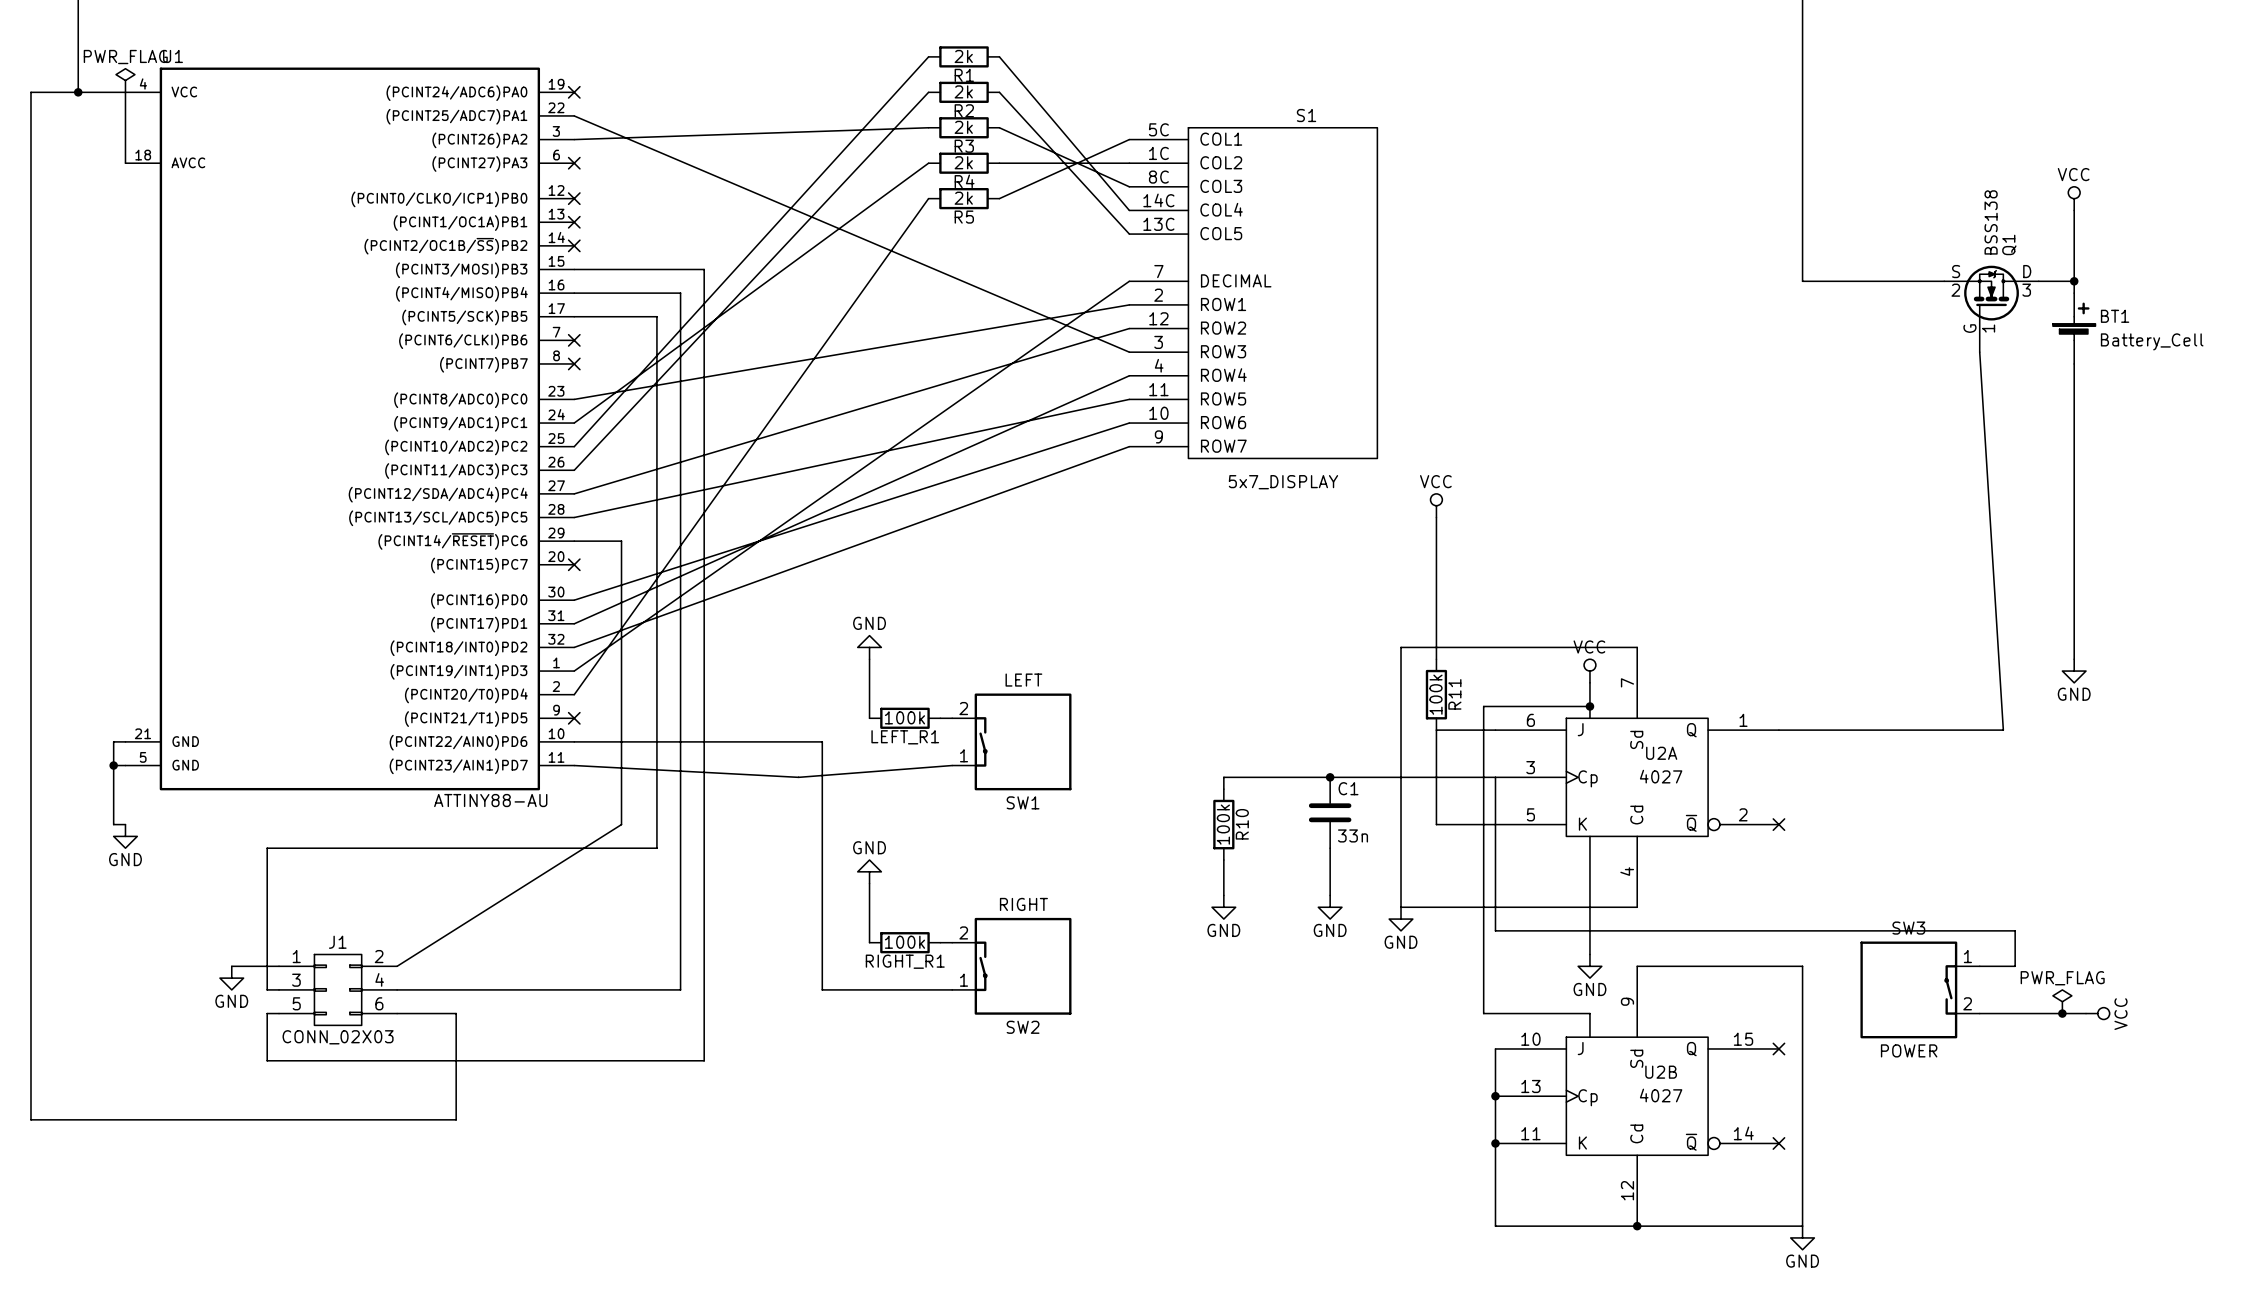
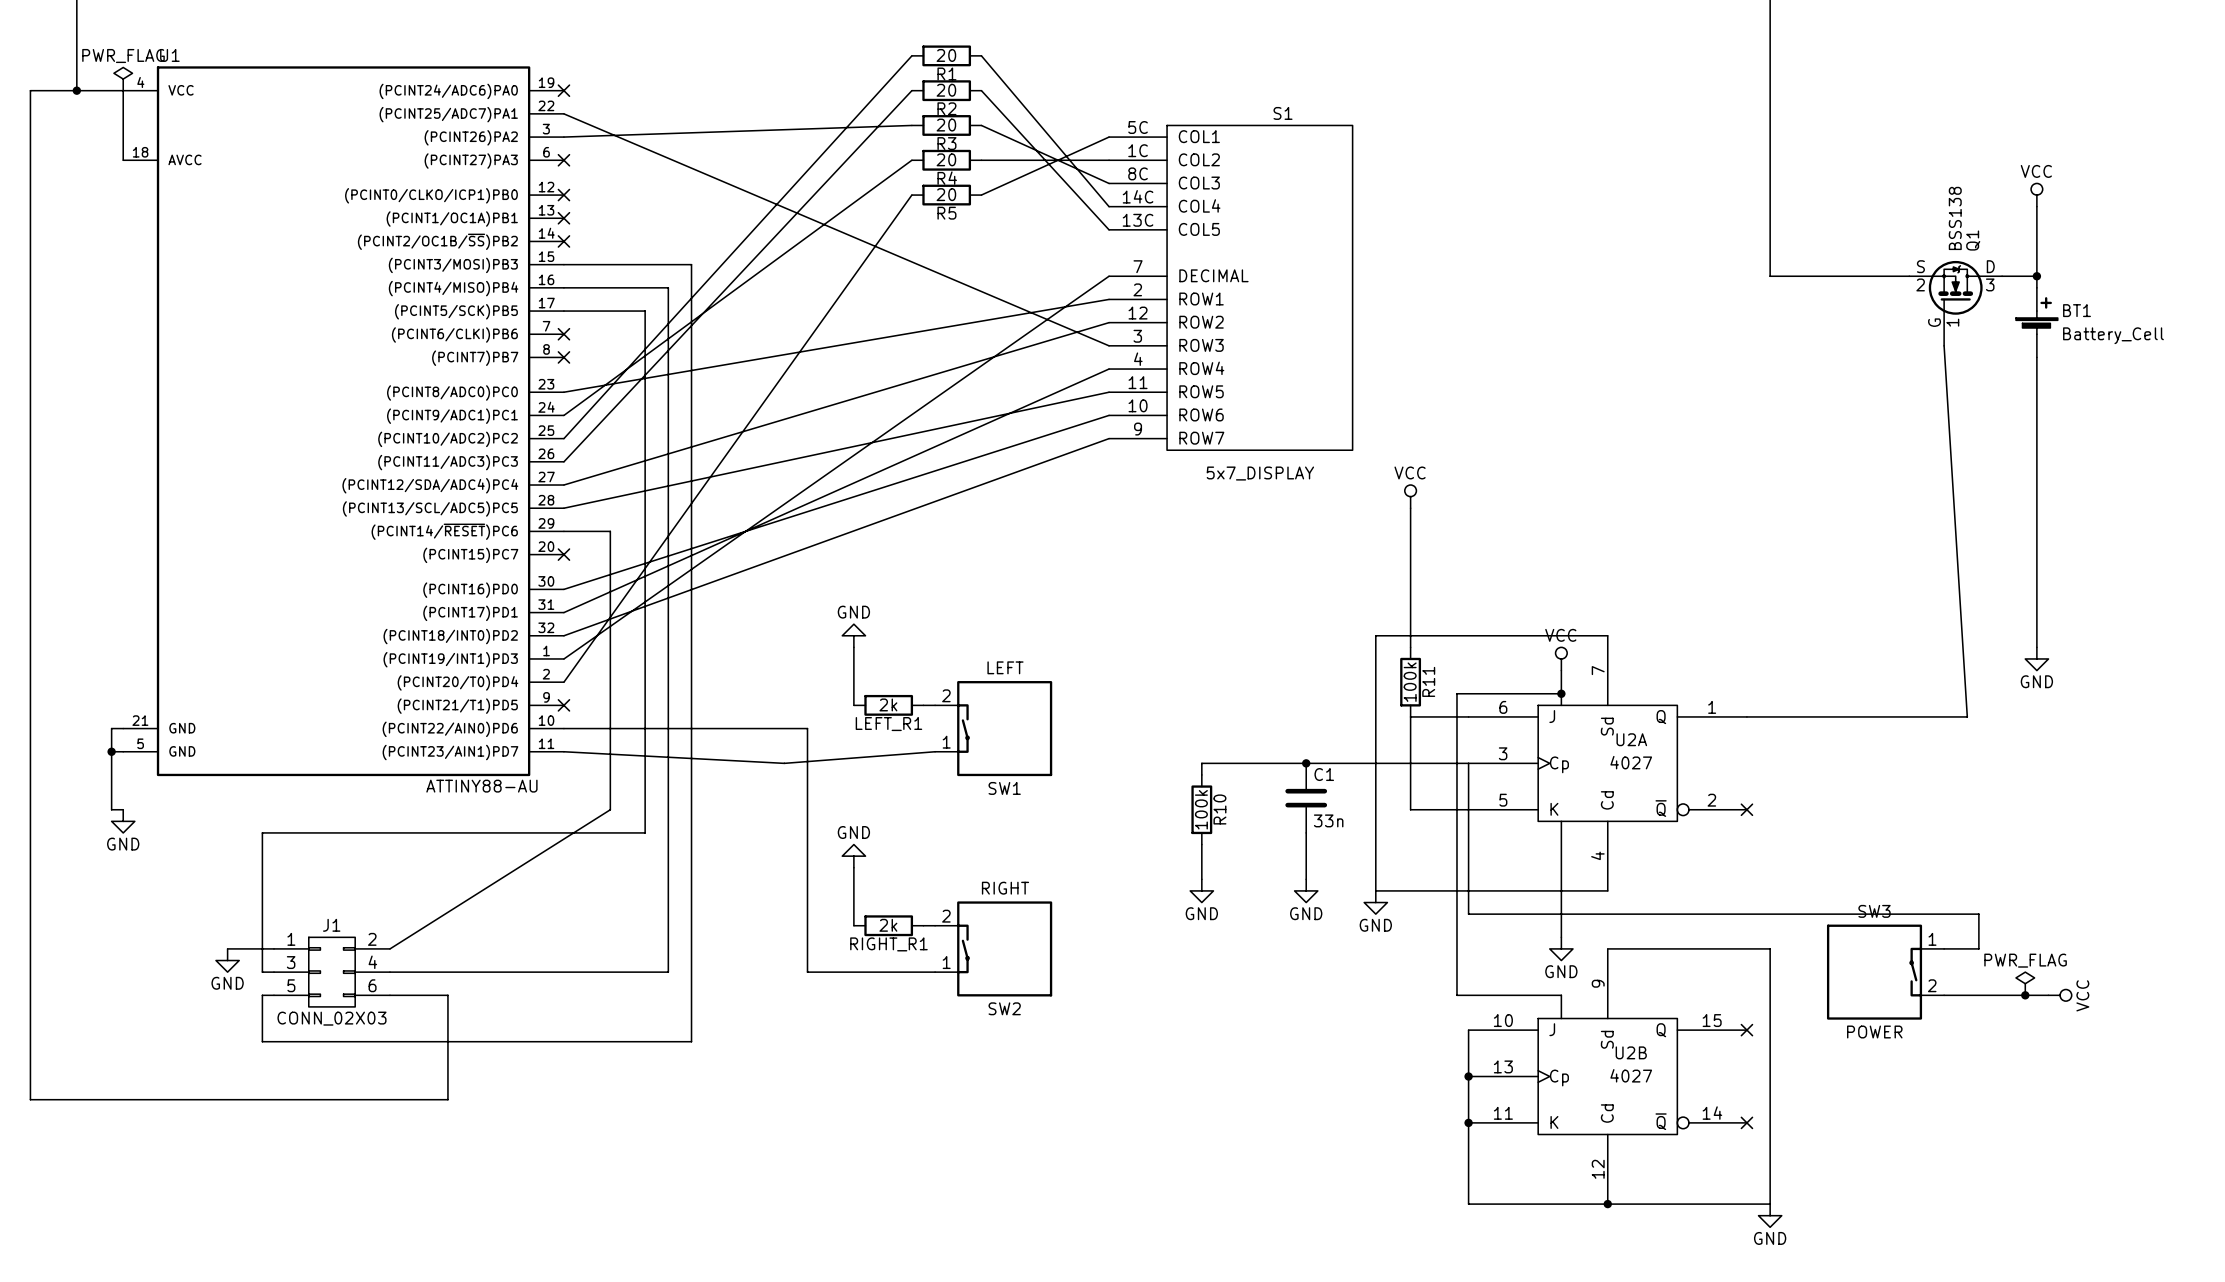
R1 value: 2k (963, 56) -> 20 (946, 55)
R2 value: 2k (963, 91) -> 20 (946, 90)
R3 value: 2k (963, 127) -> 20 (946, 125)
R4 value: 2k (963, 162) -> 20 (946, 159)
R5 value: 2k (963, 198) -> 20 (946, 194)
LEFT_R1 value: 100k (904, 717) -> 2k (888, 704)
RIGHT_R1 value: 100k (904, 942) -> 2k (888, 925)

